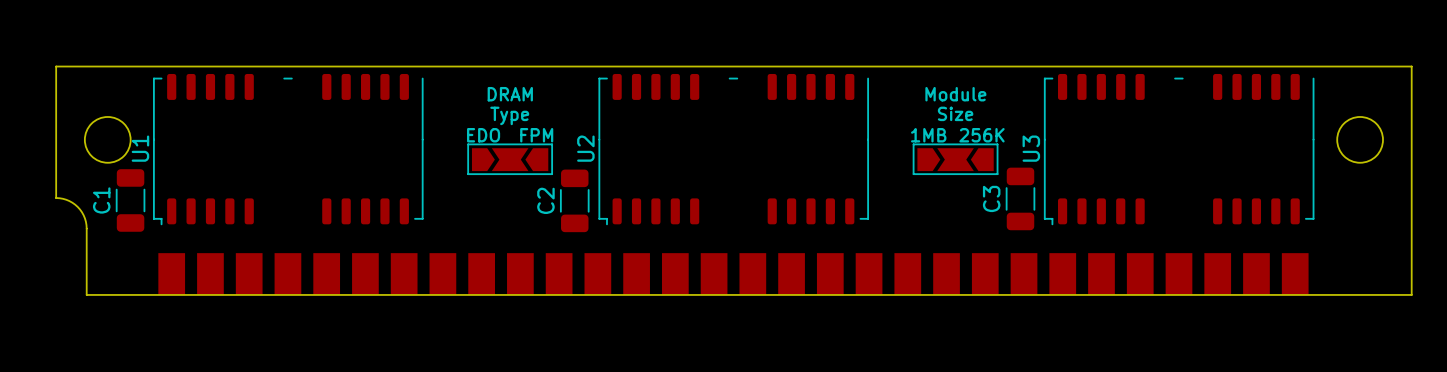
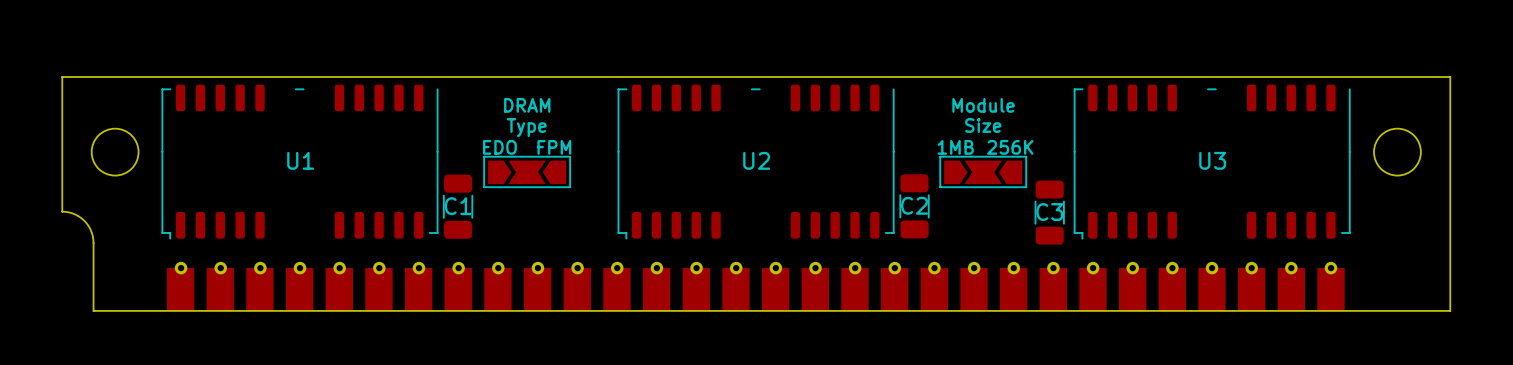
U1 name rotation: 0° (140, 148) -> 90° clockwise (300, 160)
U1 name position: U1 (140, 148) -> U1 (300, 160)
U2 name rotation: 0° (585, 148) -> 90° clockwise (756, 160)
U2 name position: U2 (585, 148) -> U2 (756, 160)
U3 name rotation: 0° (1031, 148) -> 90° clockwise (1212, 160)
U3 name position: U3 (1031, 148) -> U3 (1212, 160)
C3 name rotation: 0° (991, 198) -> 90° clockwise (1049, 212)
C1 name rotation: 0° (101, 200) -> 90° clockwise (458, 206)
C1 position: (130, 200) -> (458, 206)
C2 name rotation: 0° (545, 200) -> 90° clockwise (914, 205)
C2 position: (574, 200) -> (914, 206)
part footprint: [158, 253, 1309, 296] -> [166, 261, 1345, 312]

